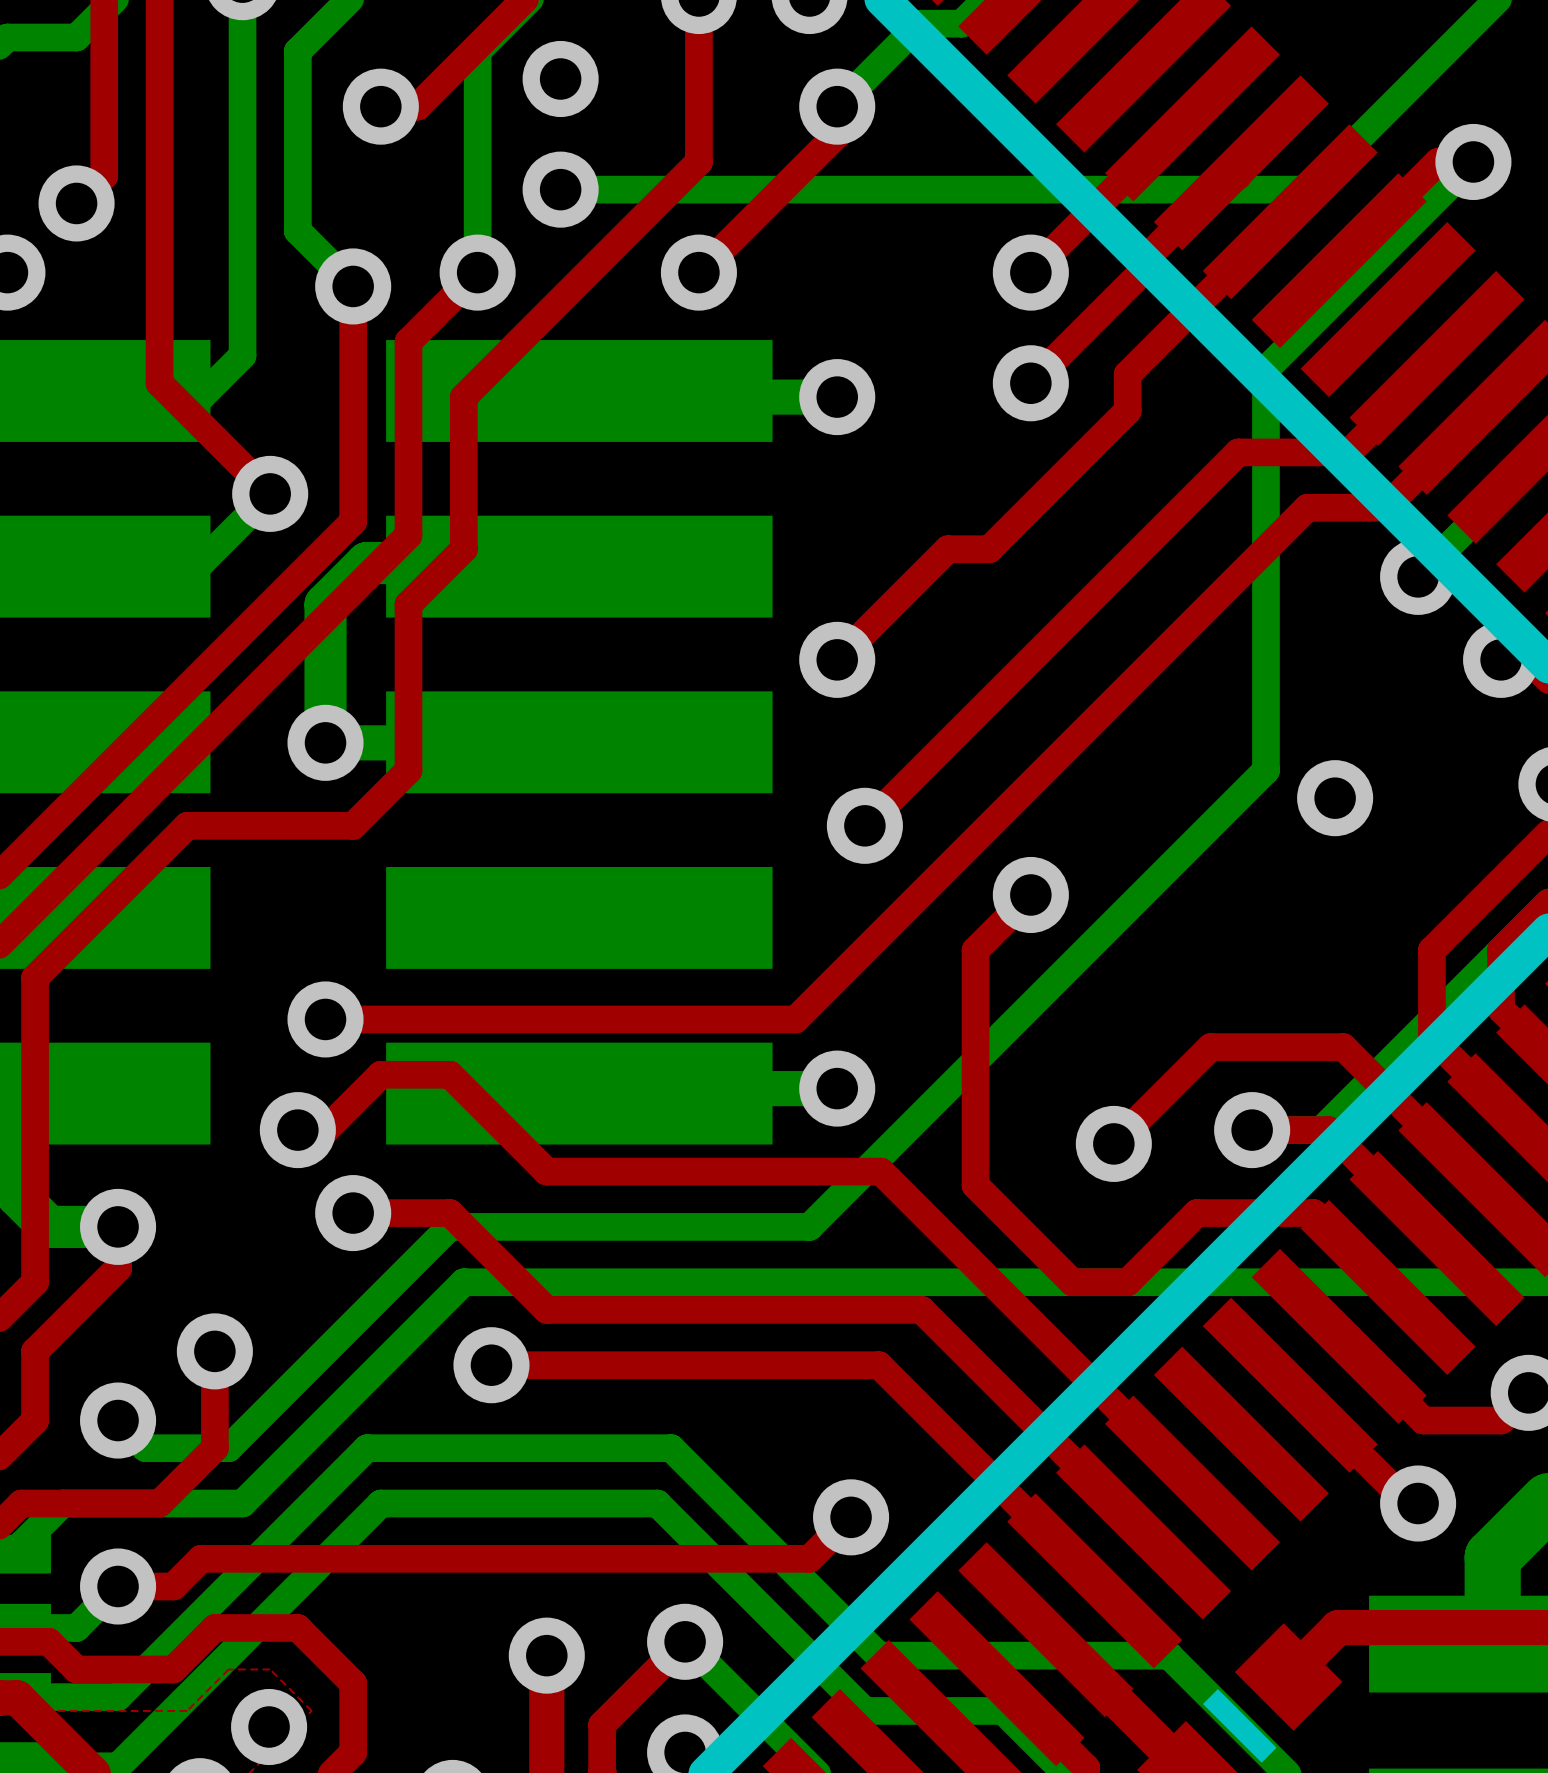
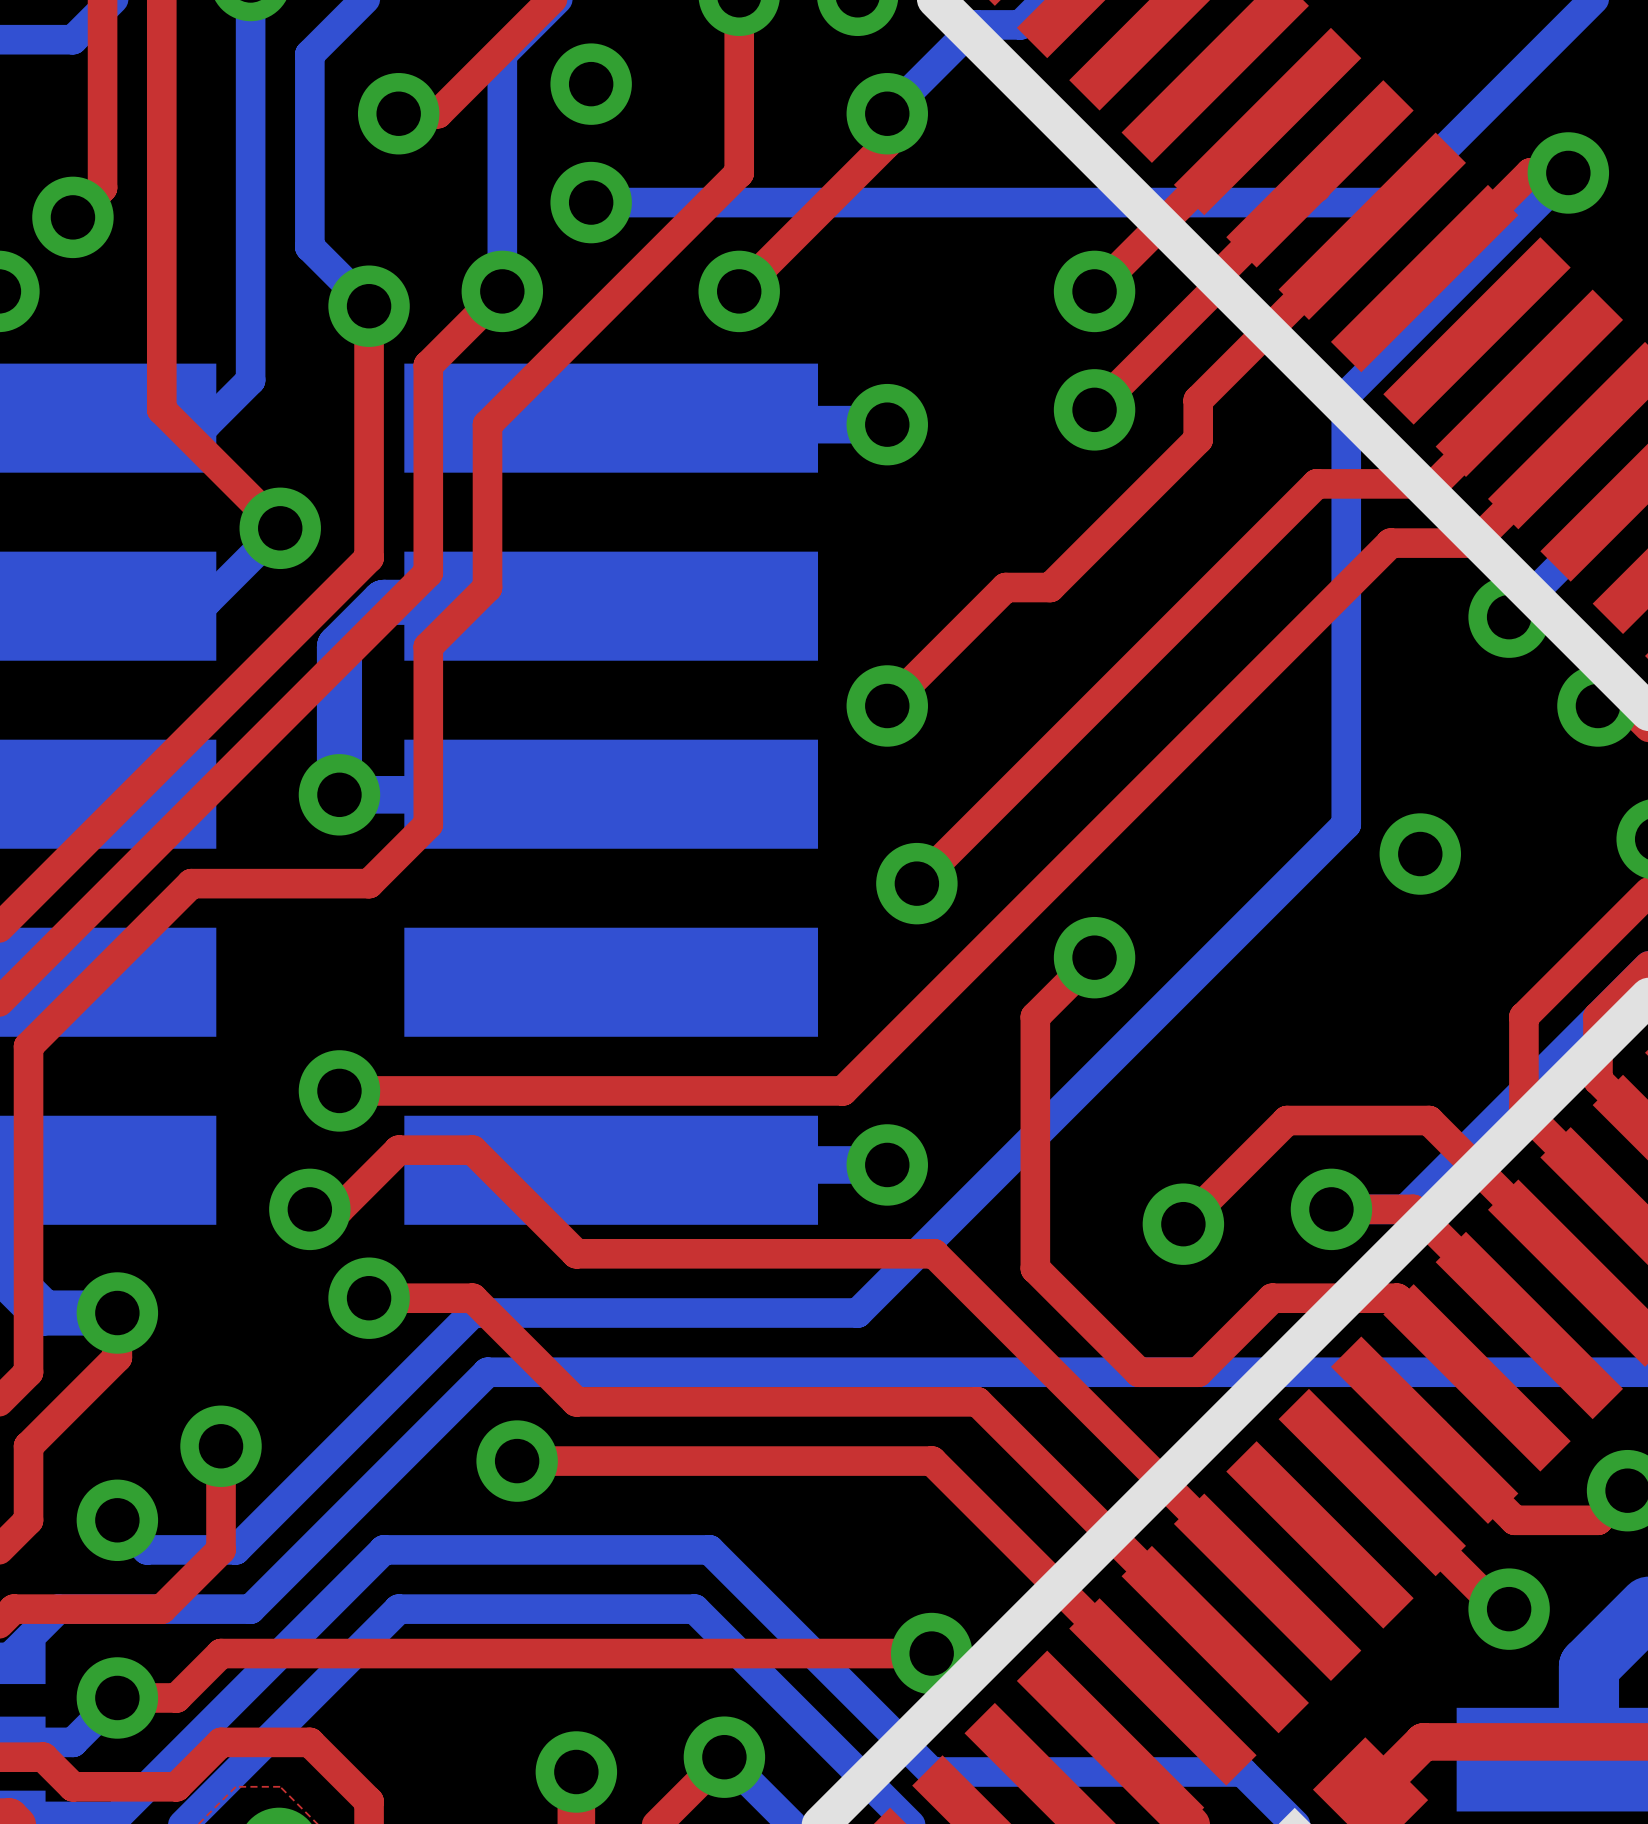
top track: (851, 1517) (809, 1558) (201, 1558) -> (931, 1653) (221, 1653) (206, 1668)
via position: (851, 1517) -> (931, 1653)

